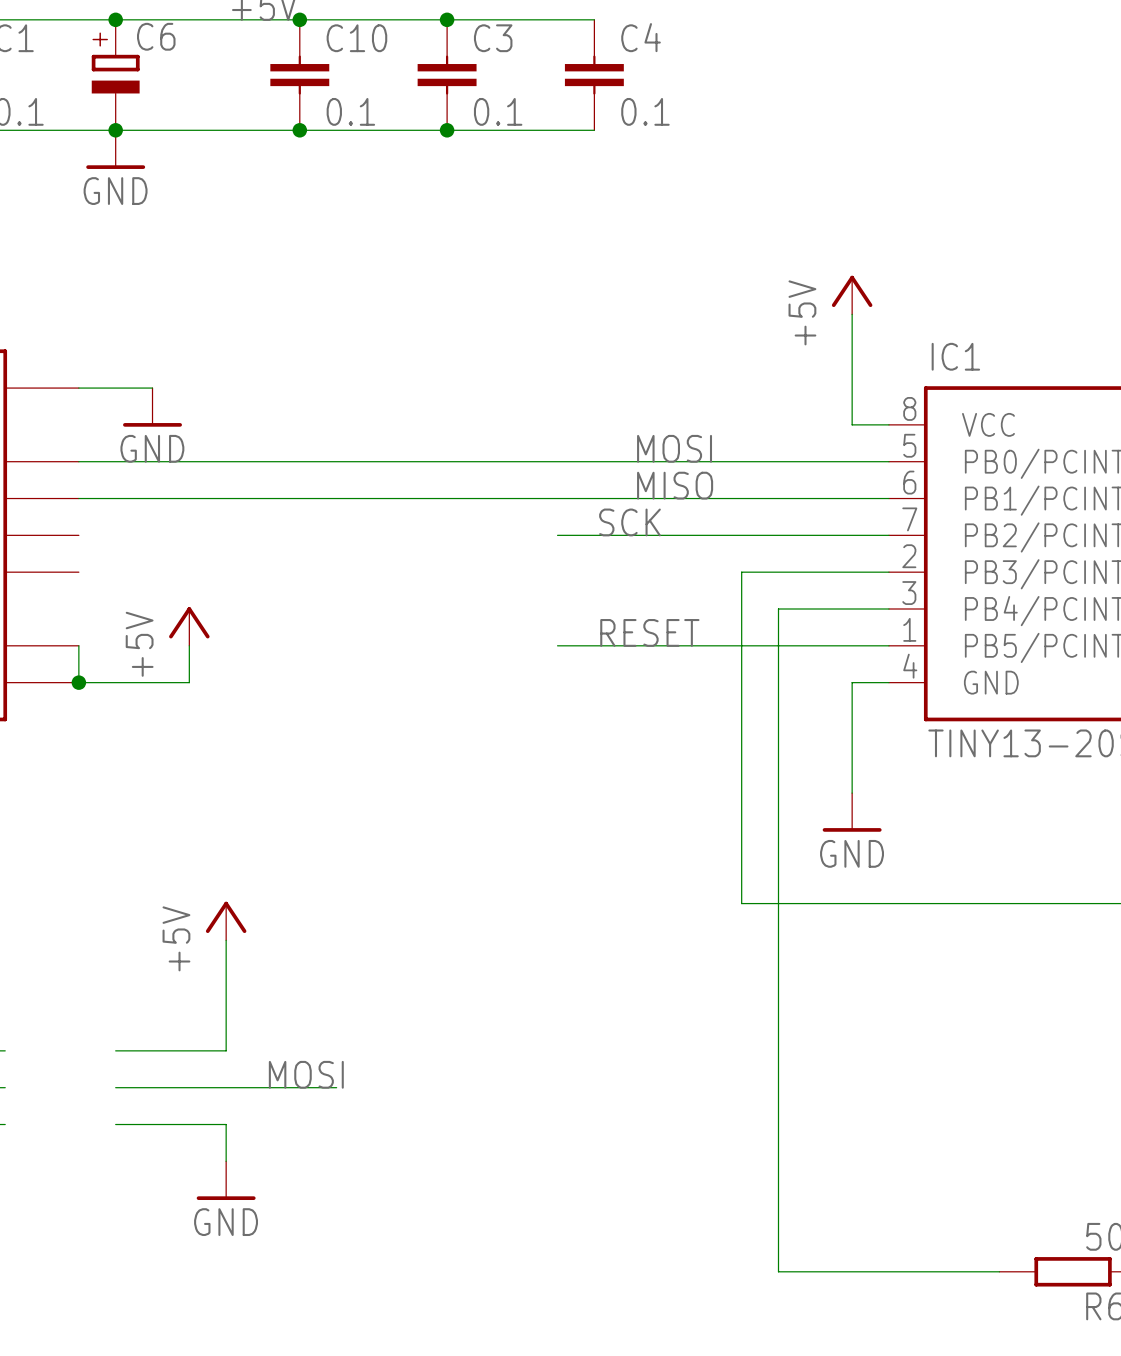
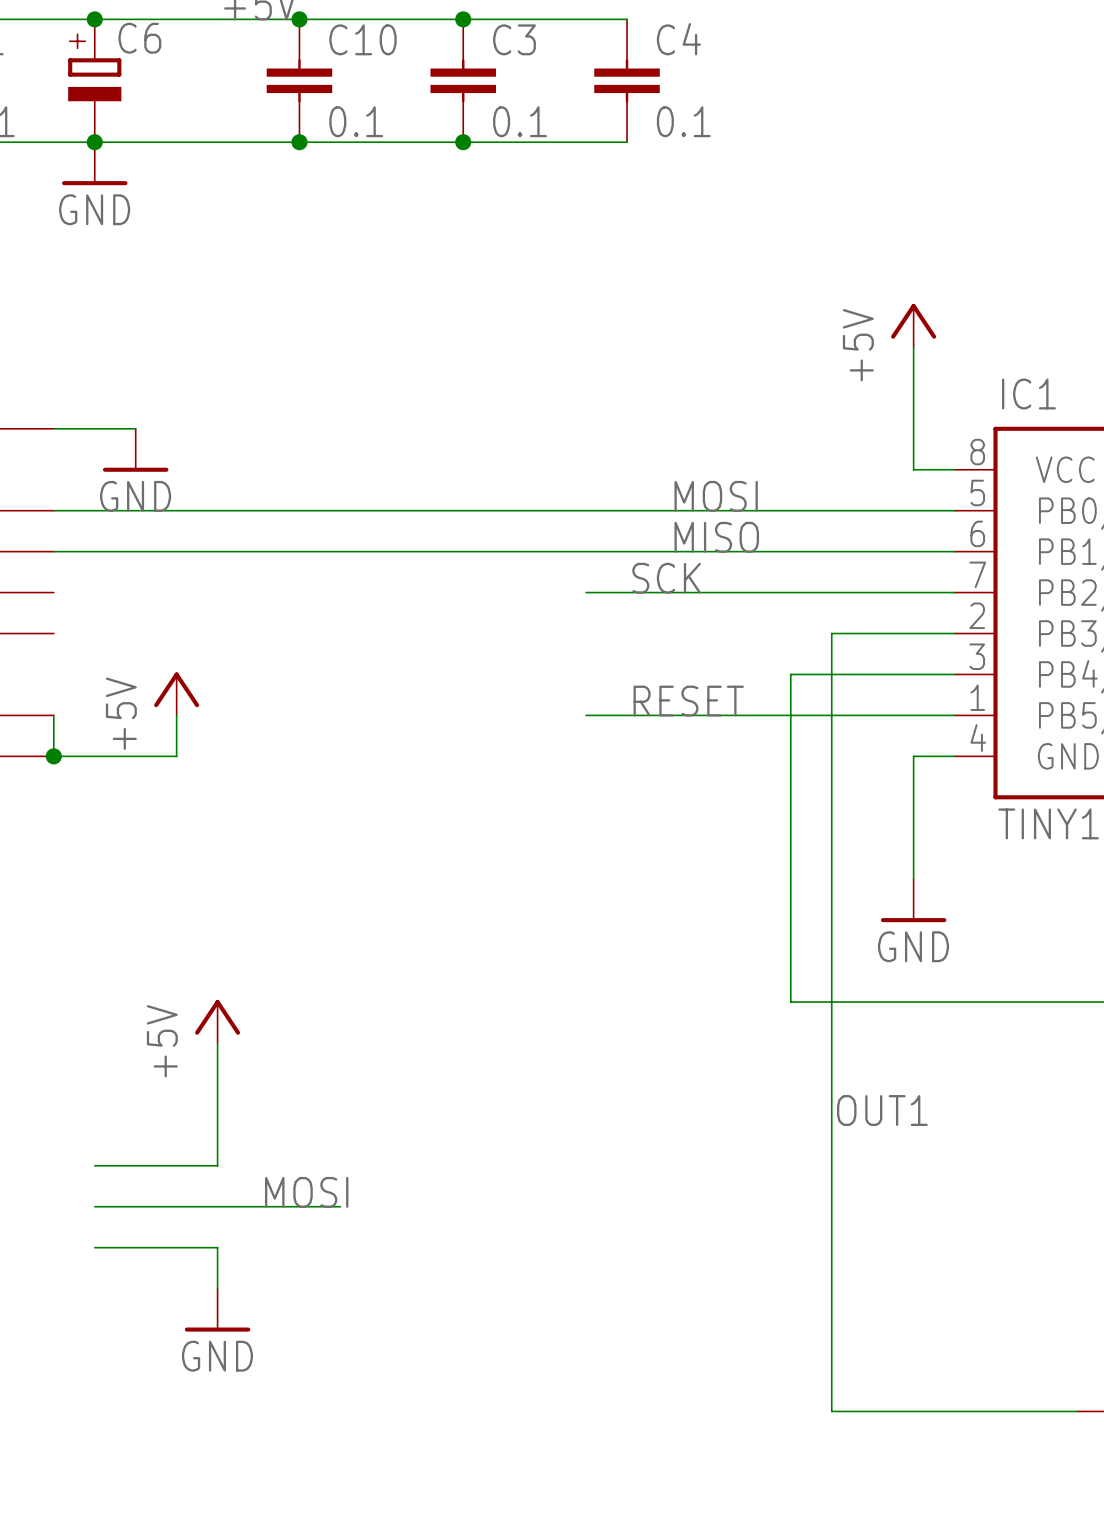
wire: (778, 572) (741, 572) (741, 608) -> (831, 633) (831, 674) (790, 674)
label: none -> OUT1 (882, 1110)

